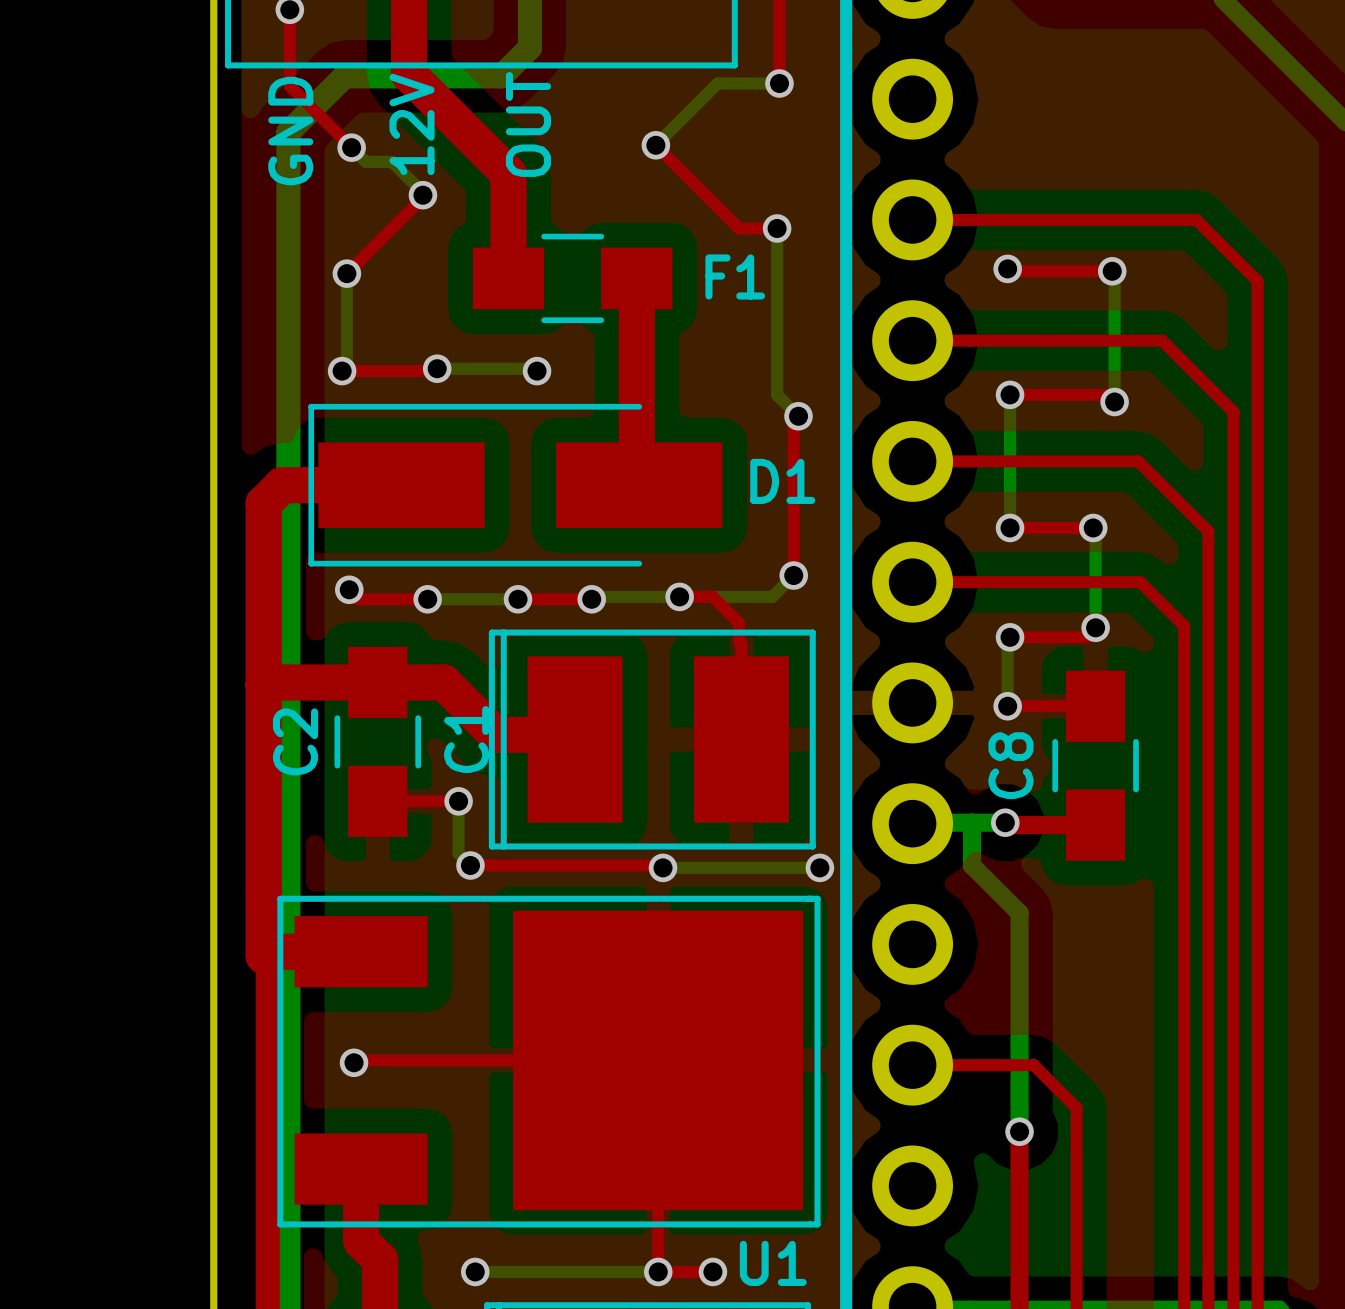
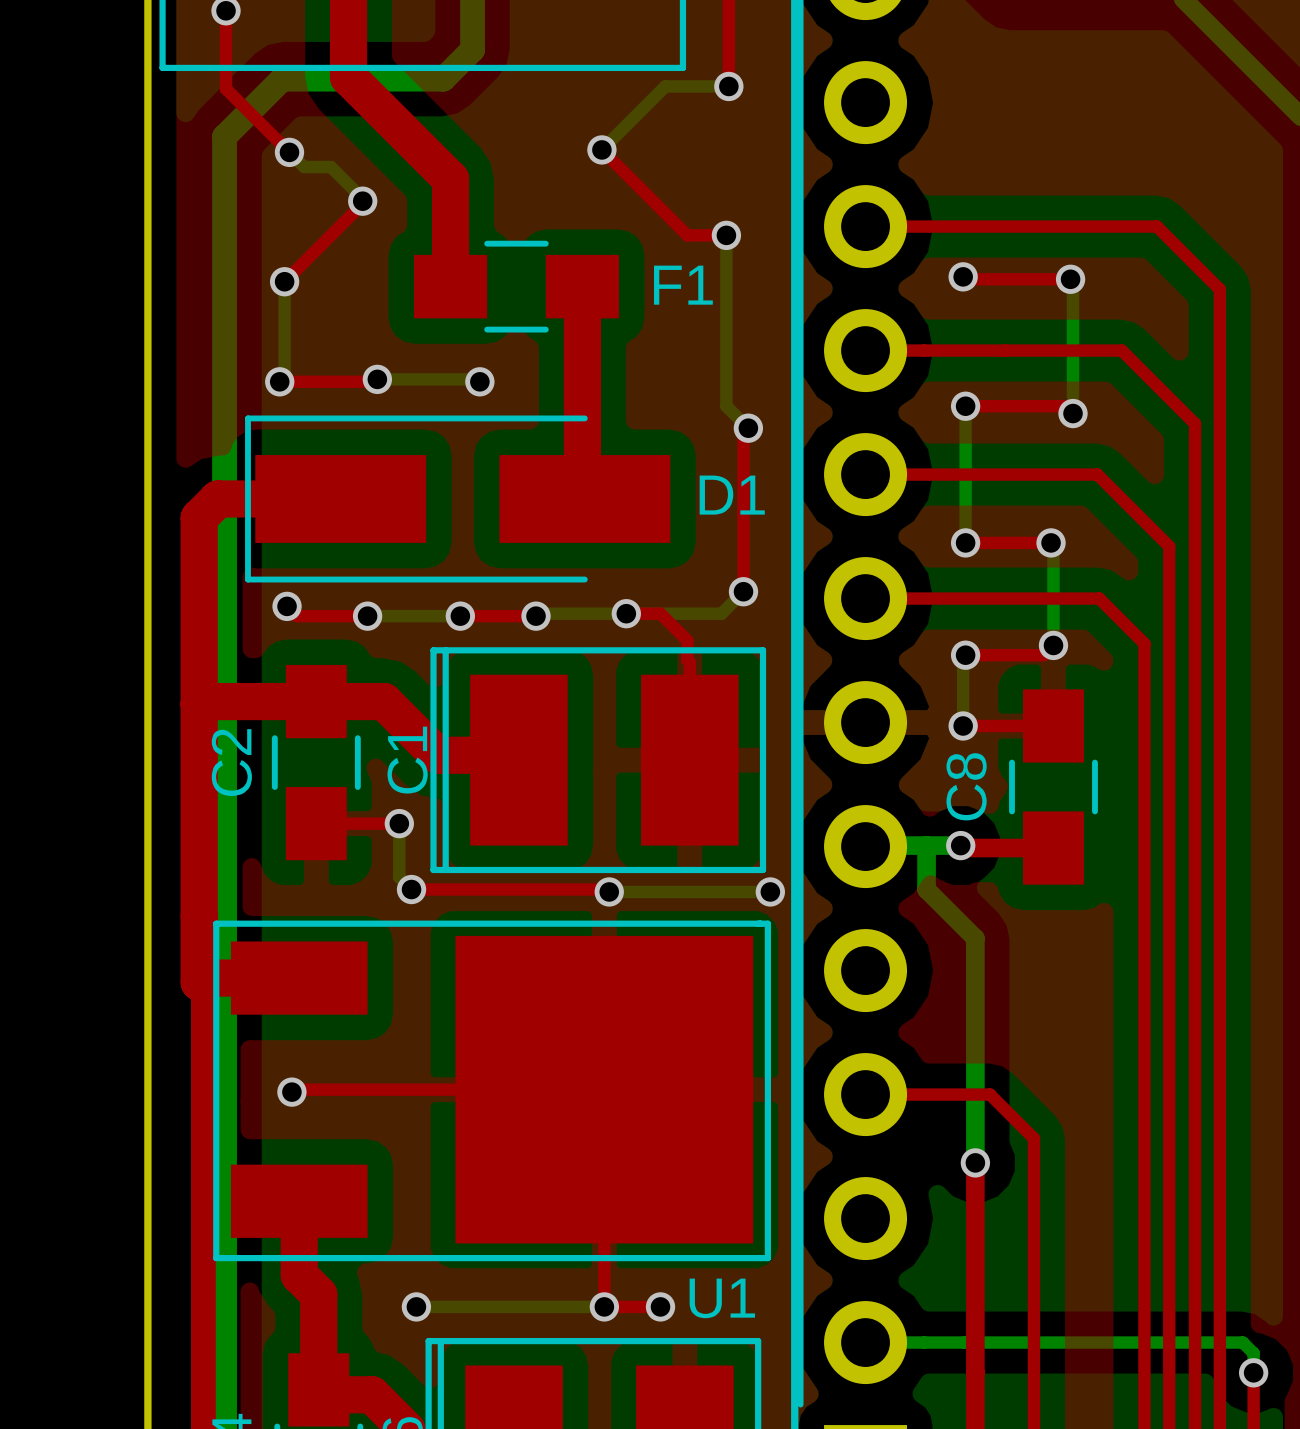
text: 12V (412, 124) -> none
text: OUT (528, 124) -> none
text: GND (290, 131) -> none

